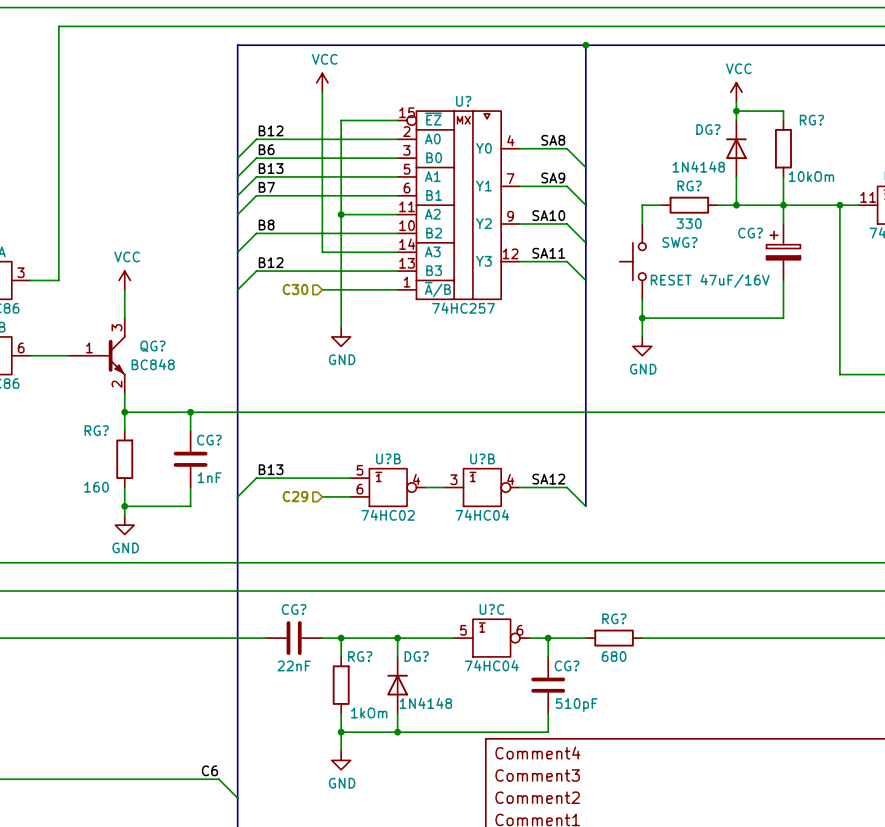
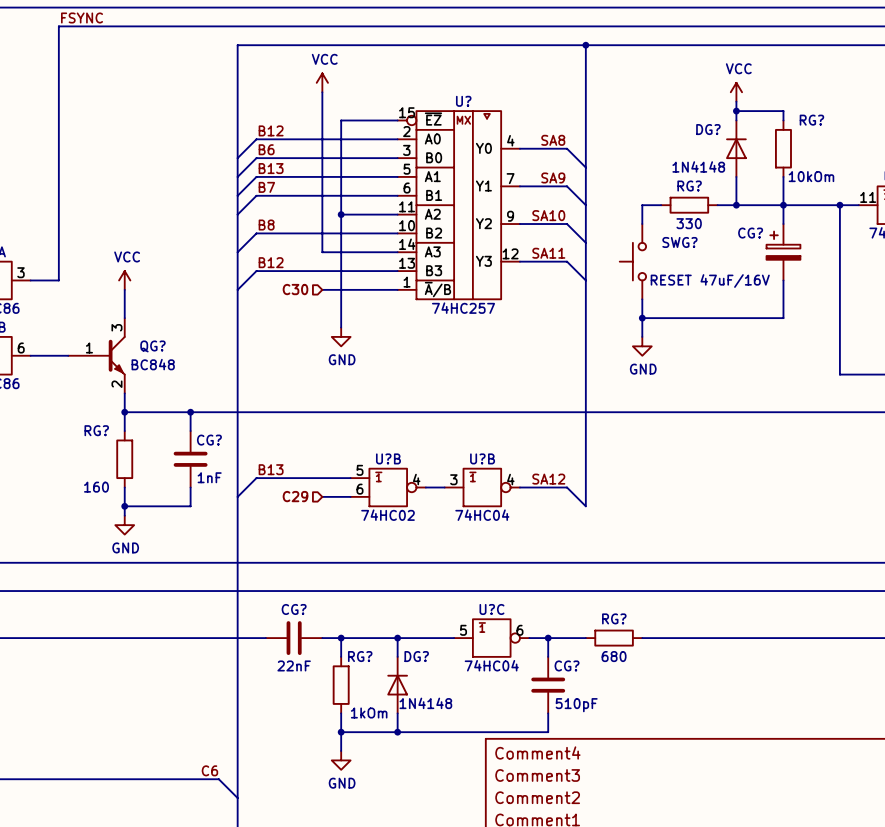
label: none -> FSYNC (82, 17)

